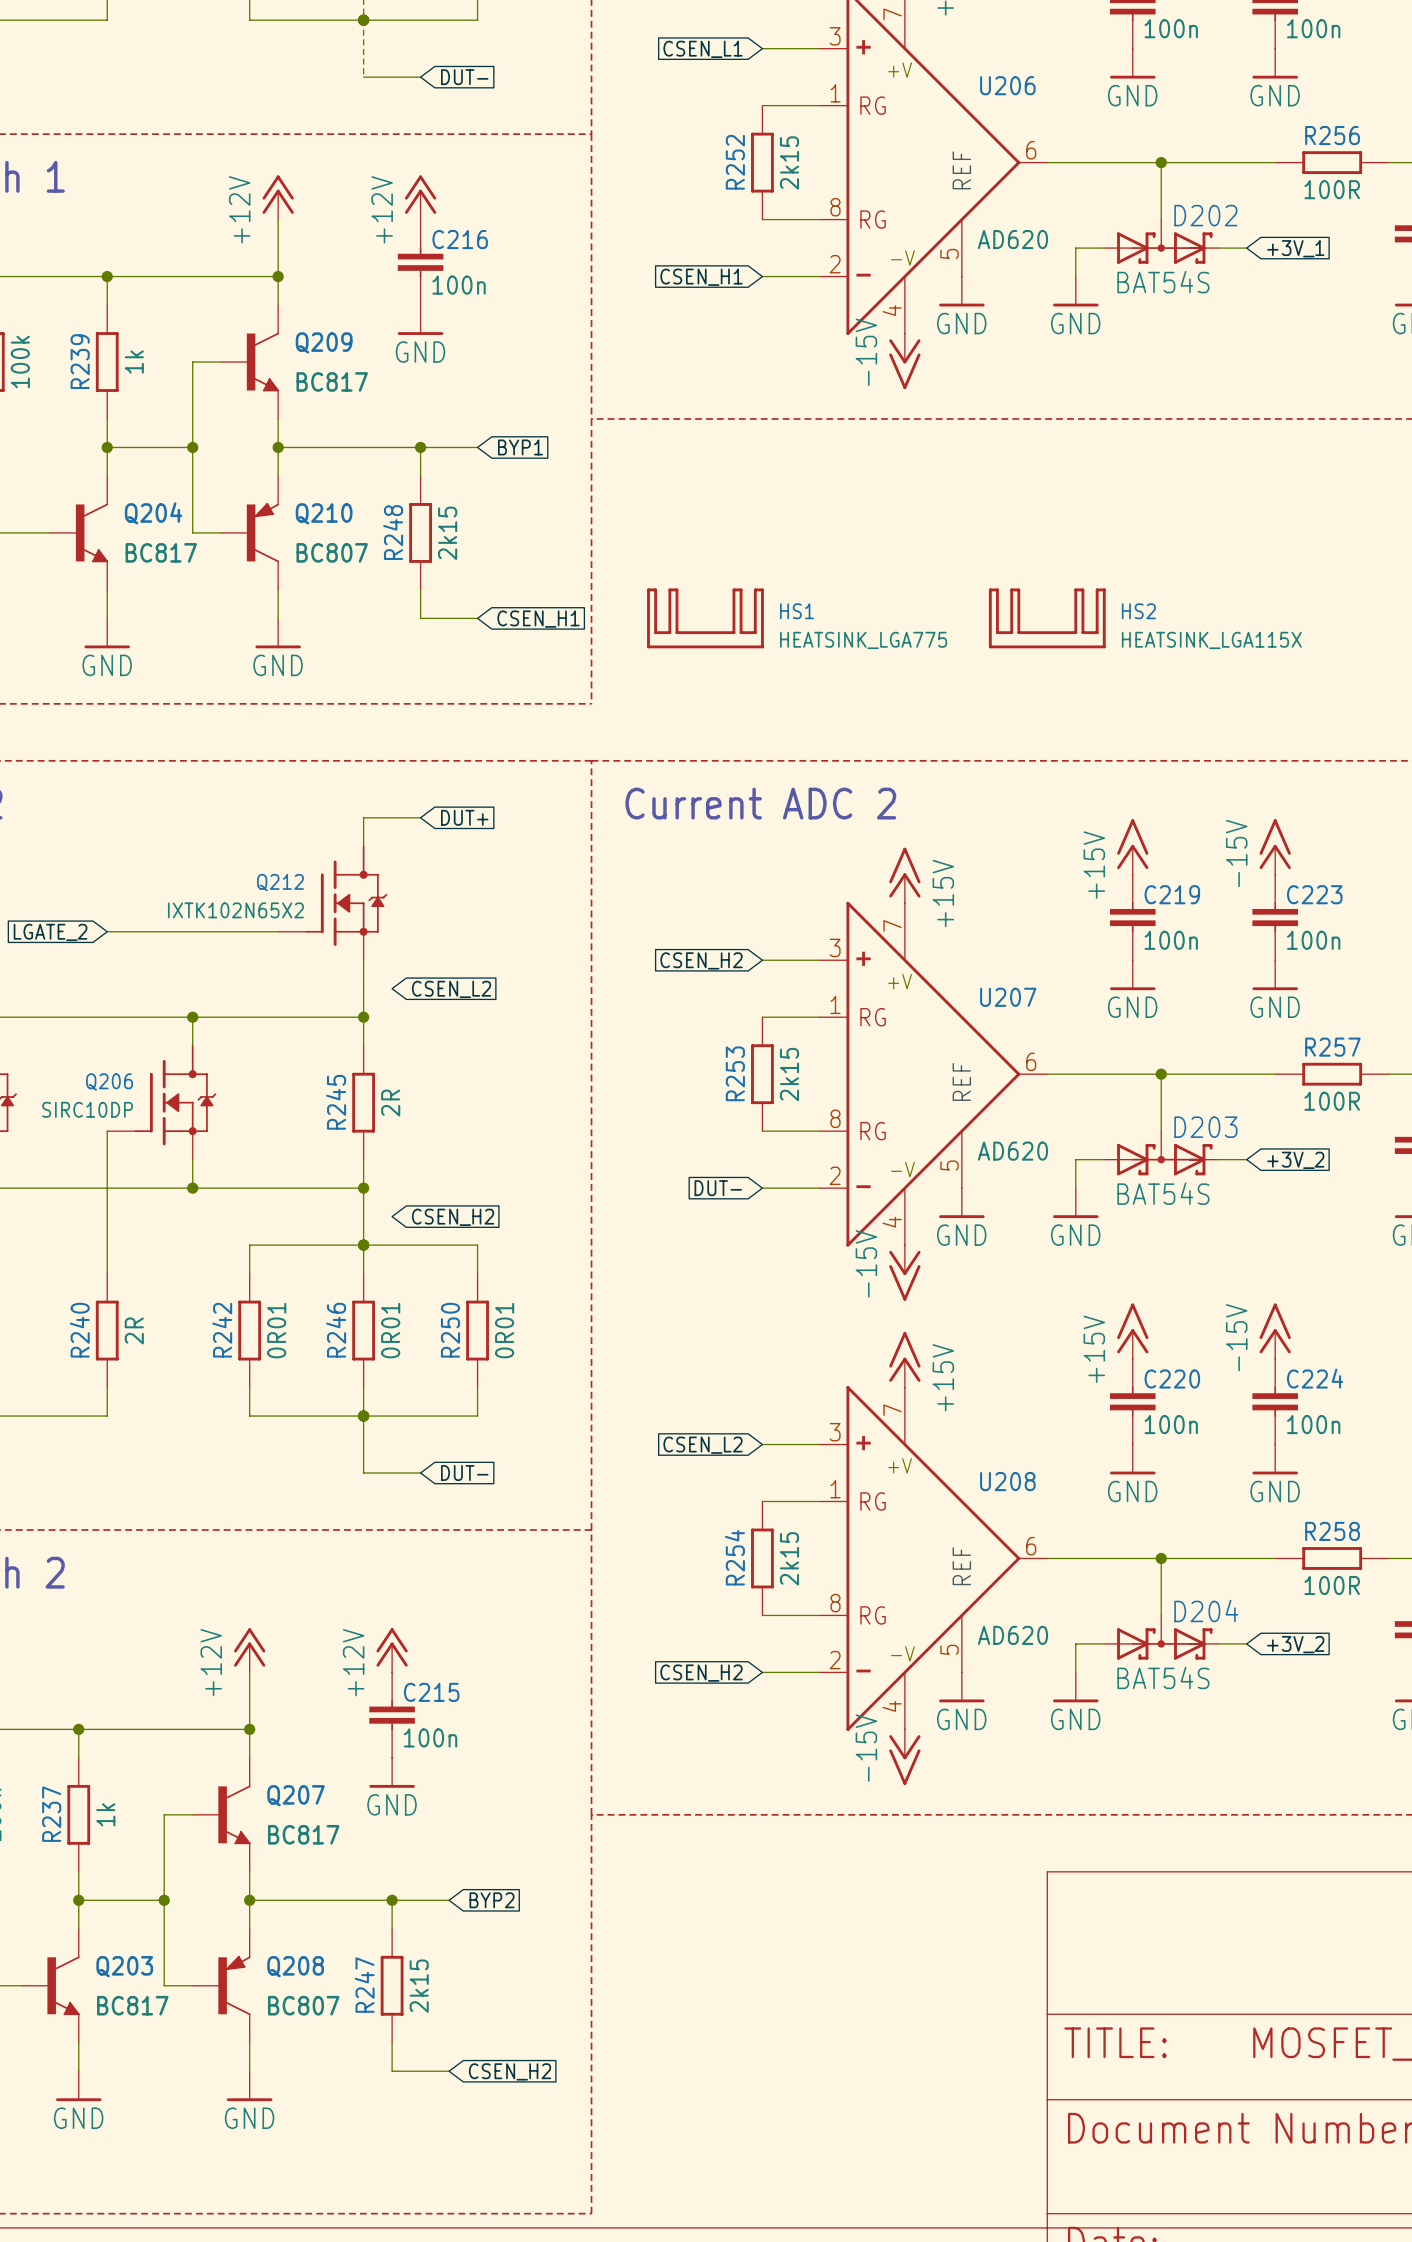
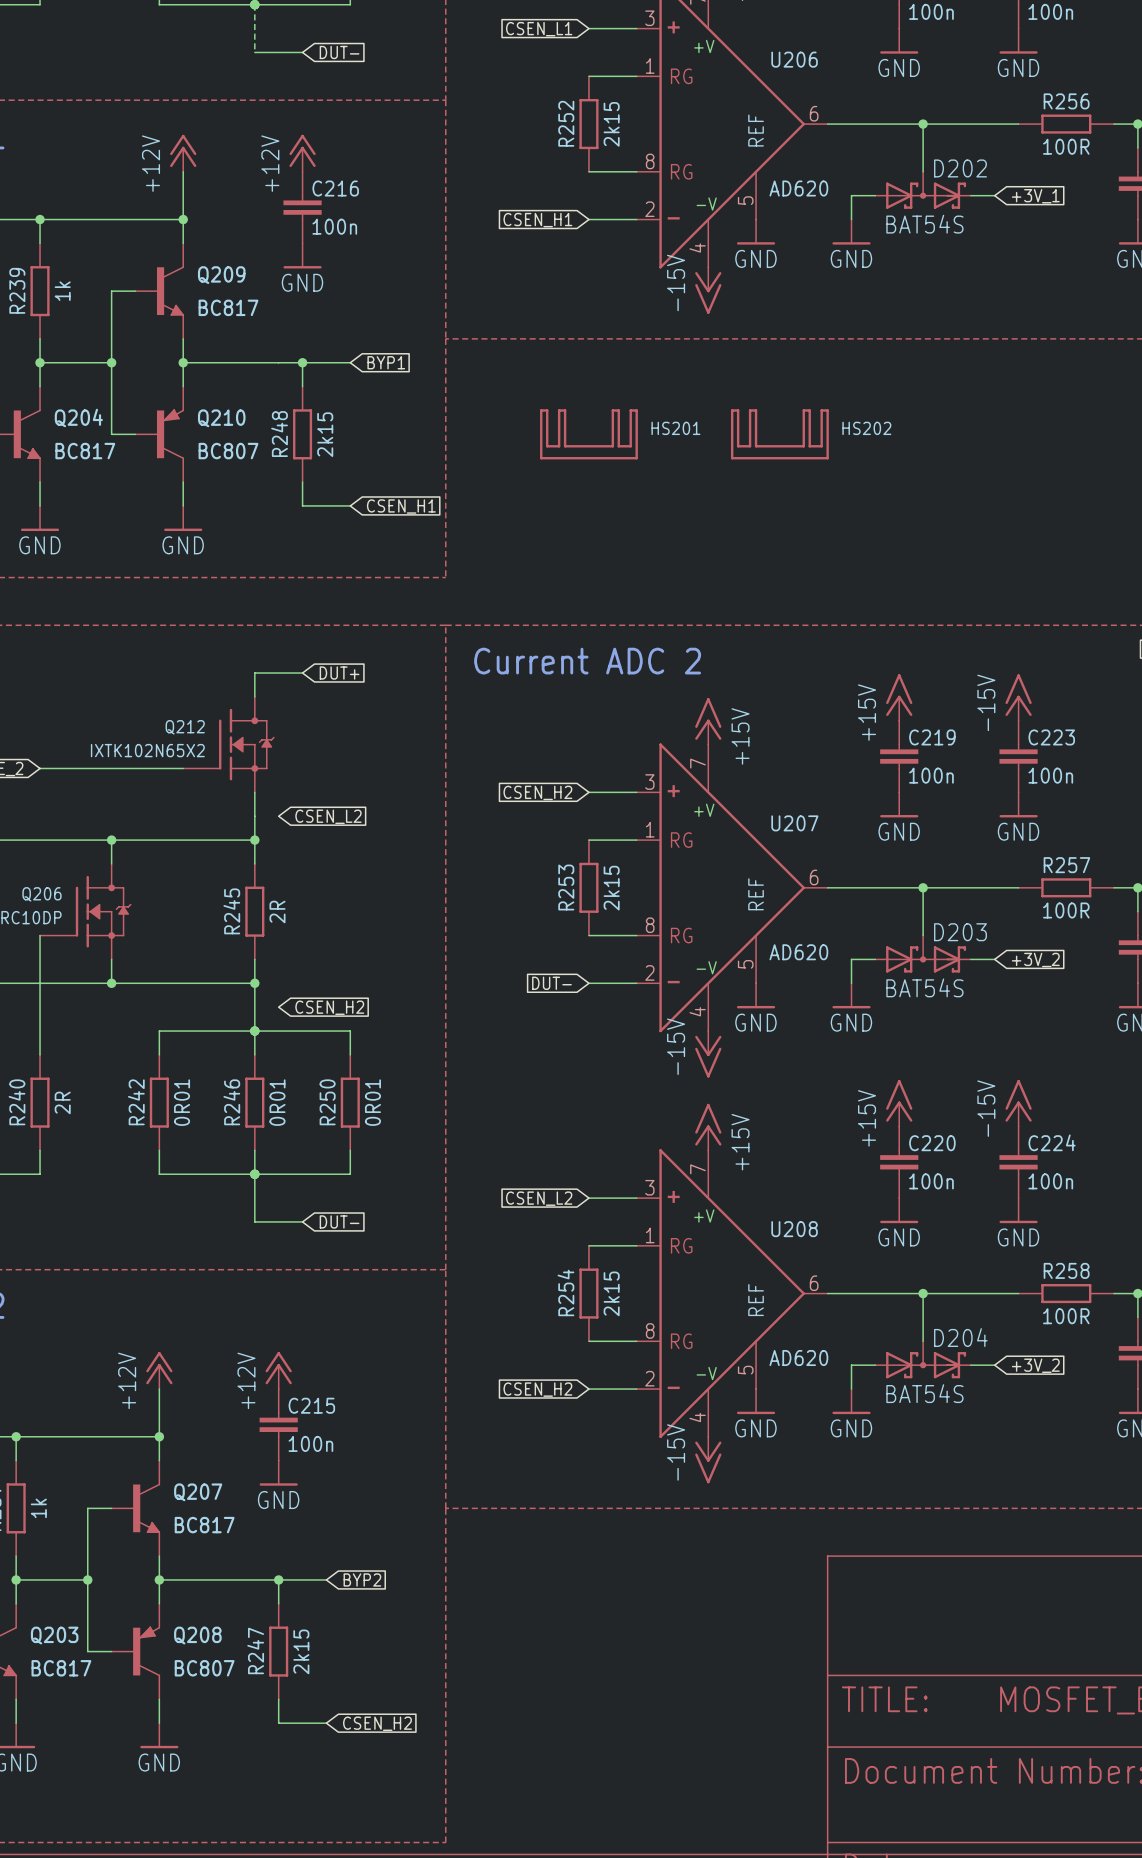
HS201: none -> (588, 434)
HS202: none -> (779, 434)
HS1: HEATSINK_LGA775 (705, 618) -> none
HS2: HEATSINK_LGA115X (1047, 618) -> none

